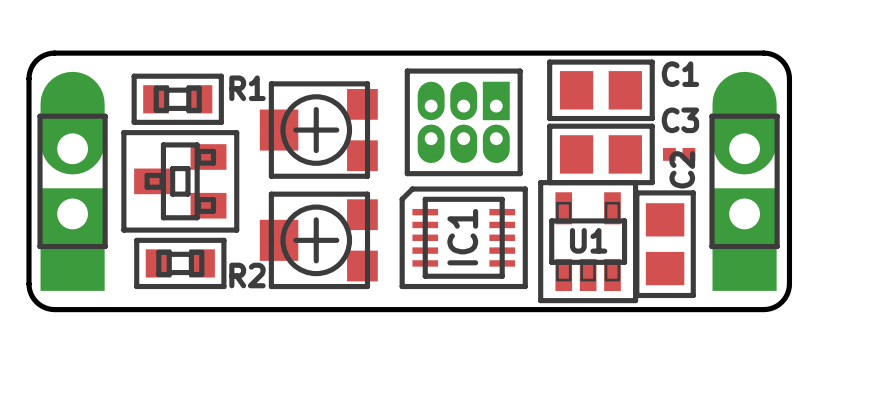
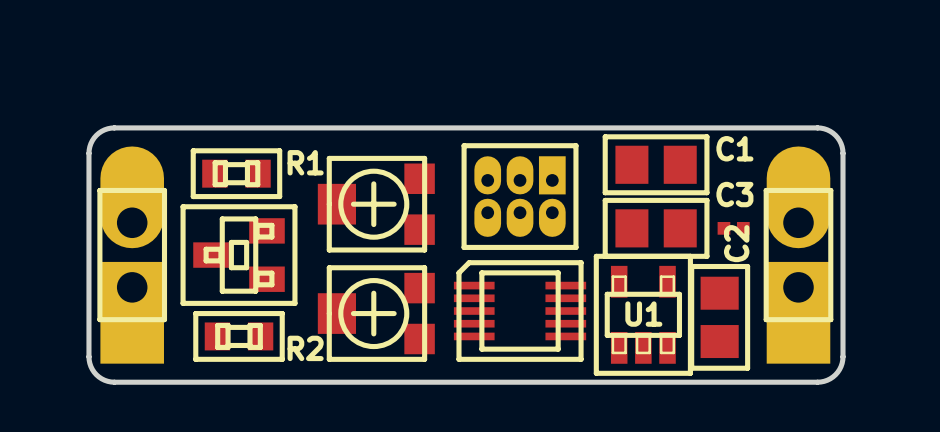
IC1: (463, 237) -> none
part: none -> (520, 311)

